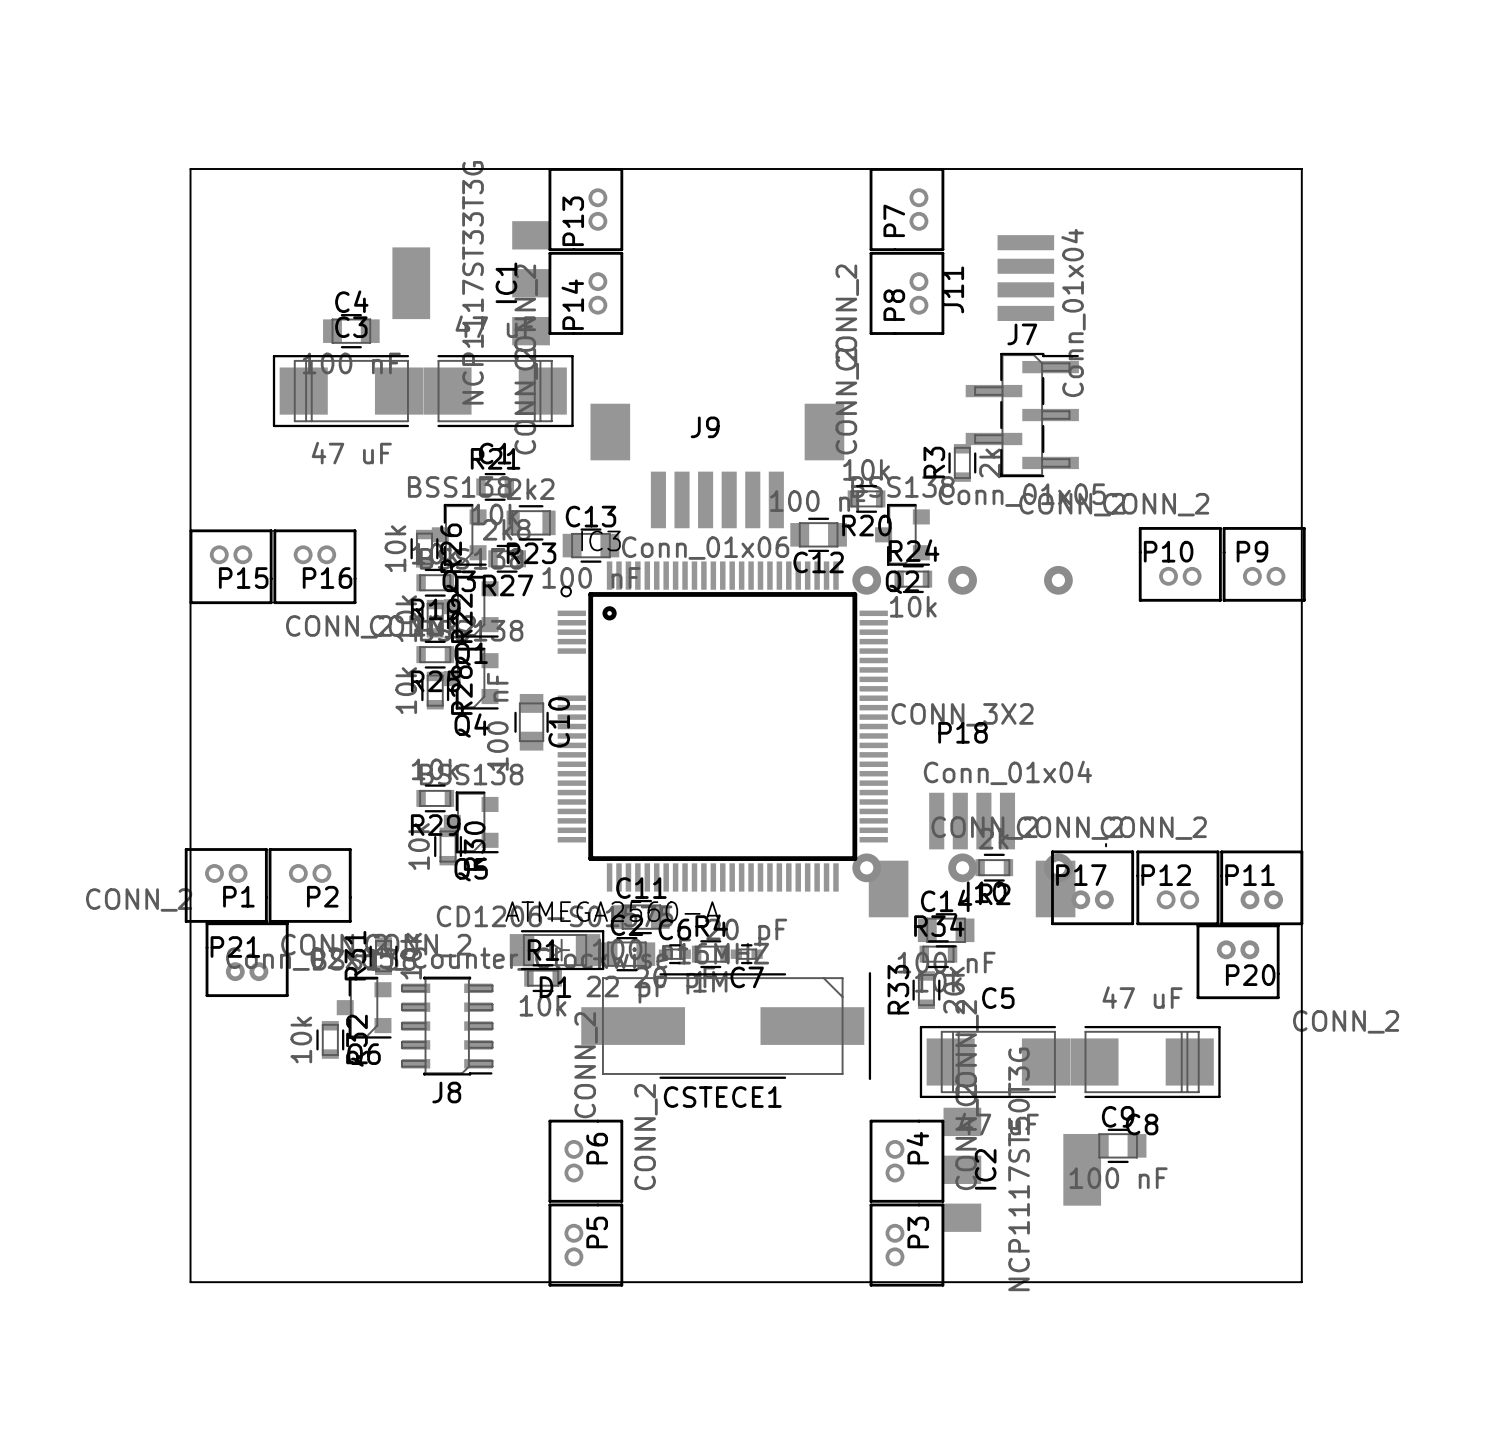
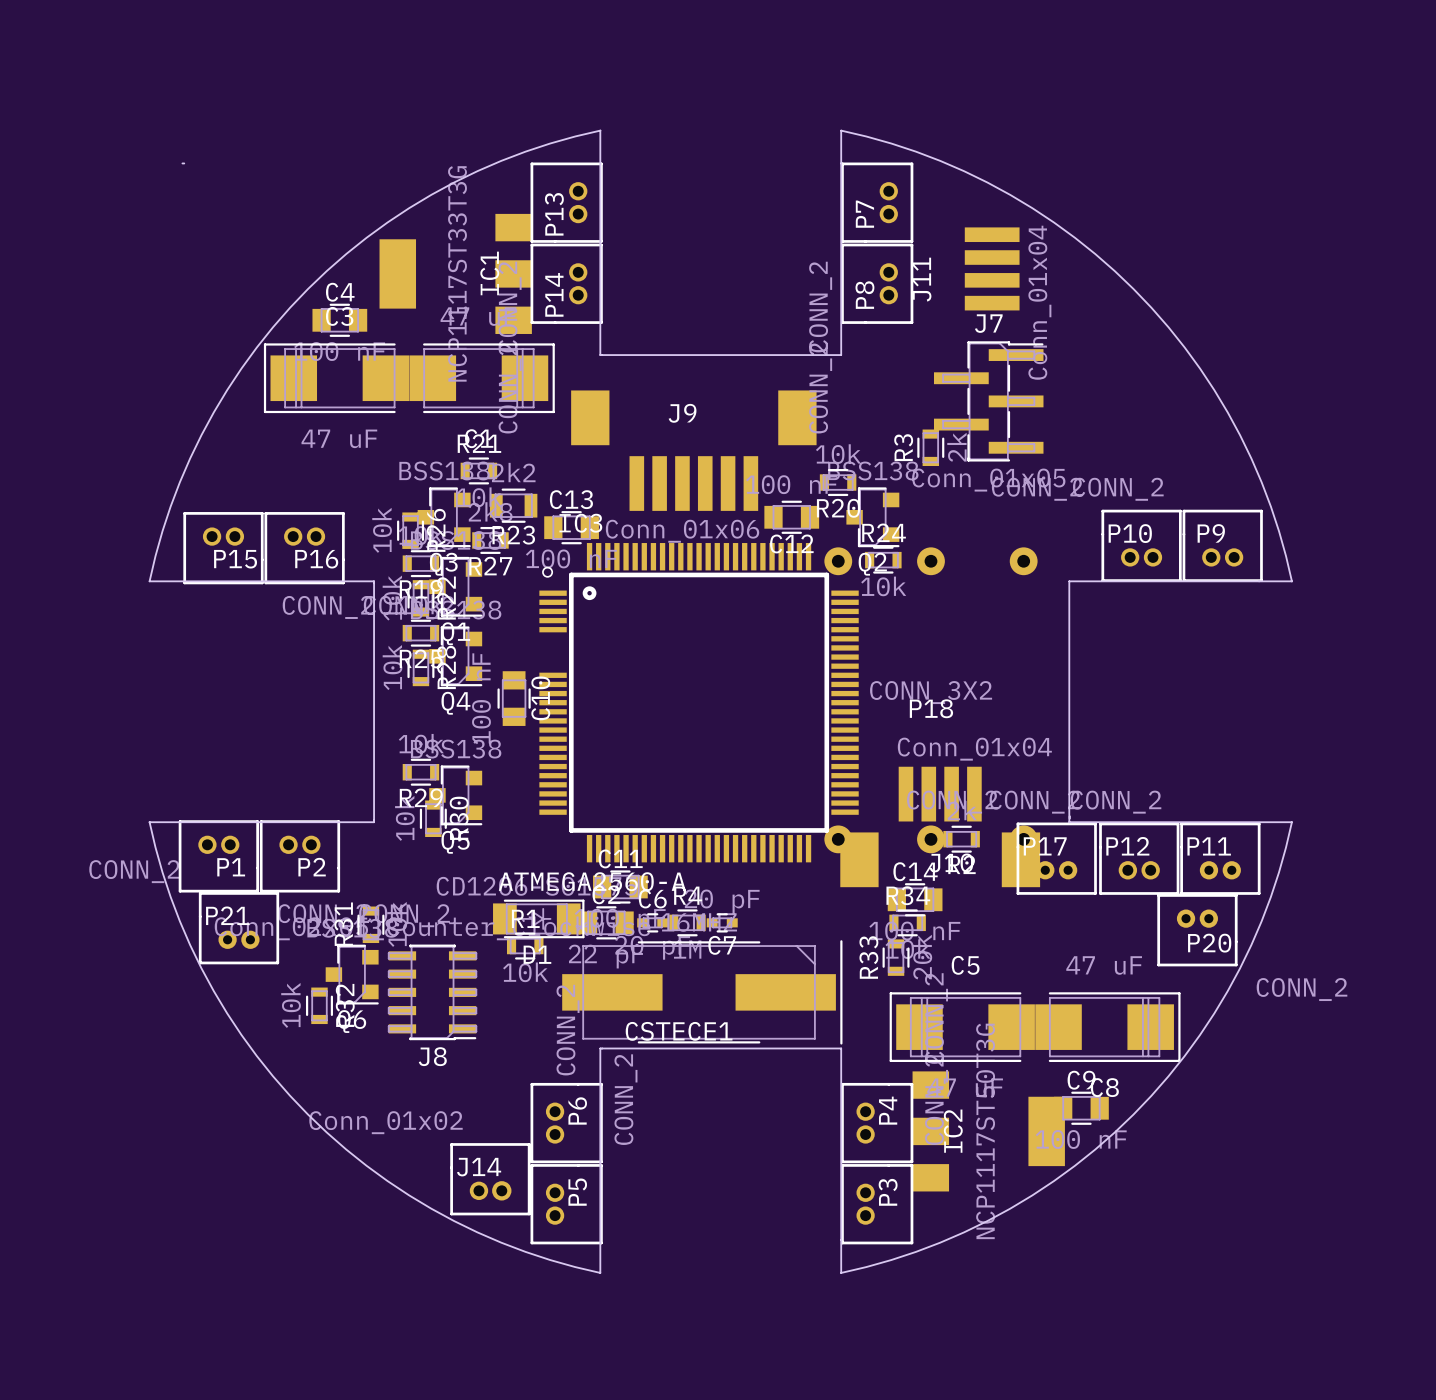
board edge: none -> (600, 130) (600, 355) (841, 355) (841, 130) (891, 143) (964, 171) (1032, 208) (1095, 254) (1151, 307) (1200, 368) (1240, 435) (1270, 506) (1291, 581)
board edge: none -> (600, 130) (525, 151) (454, 182) (387, 222) (326, 271) (273, 327) (227, 390) (190, 458) (162, 531) (149, 581) (374, 581) (374, 822) (149, 822)
board edge: (190, 169) (1301, 169) (1301, 1282) (190, 1282) (190, 169) -> (182, 163) (184, 163)
board edge: none -> (1291, 581) (1069, 581) (1069, 822) (1291, 822) (1278, 872) (1251, 945) (1214, 1013) (1168, 1076) (1114, 1132) (1053, 1181) (987, 1221) (915, 1251) (841, 1272)
board edge: none -> (149, 822) (170, 896) (201, 968) (241, 1034) (290, 1095) (346, 1149) (409, 1195) (477, 1232) (550, 1260) (600, 1272) (600, 1048) (841, 1048) (841, 1272)
CSTECE1 name position: CSTECE1 (722, 1097) -> CSTECE1 (679, 1031)
J14: none -> Conn_01x02 (490, 1179)

